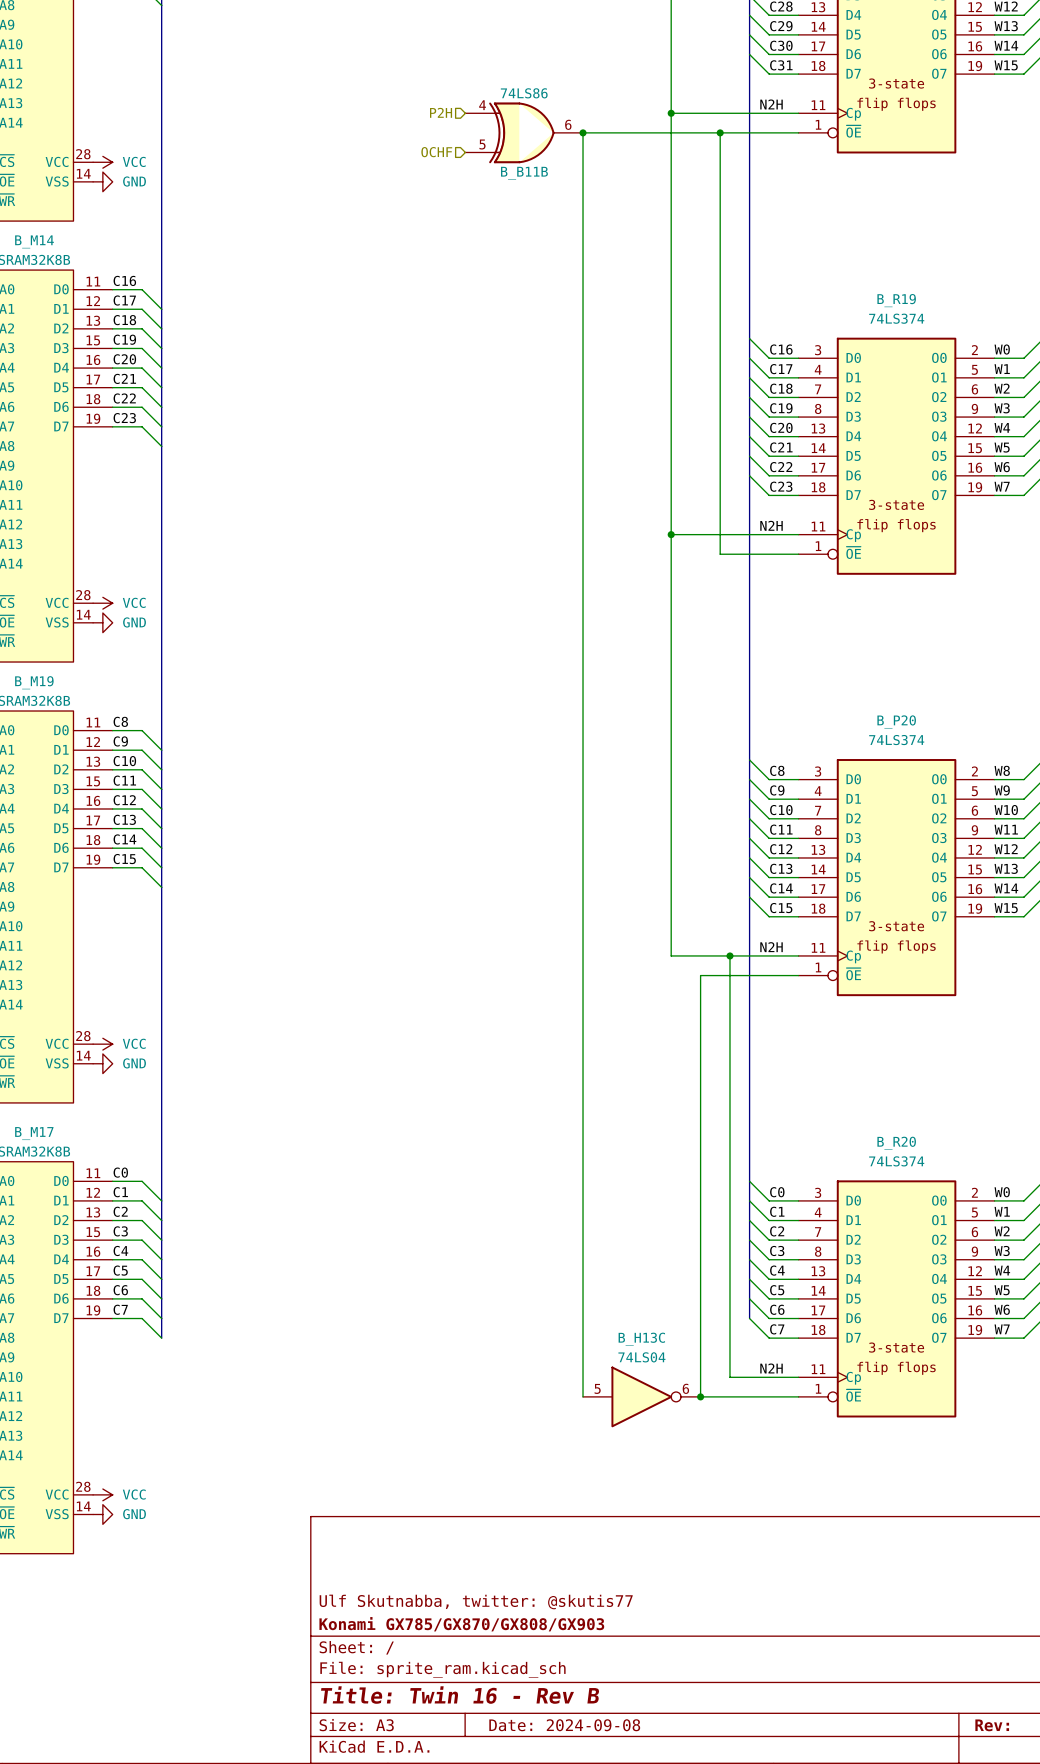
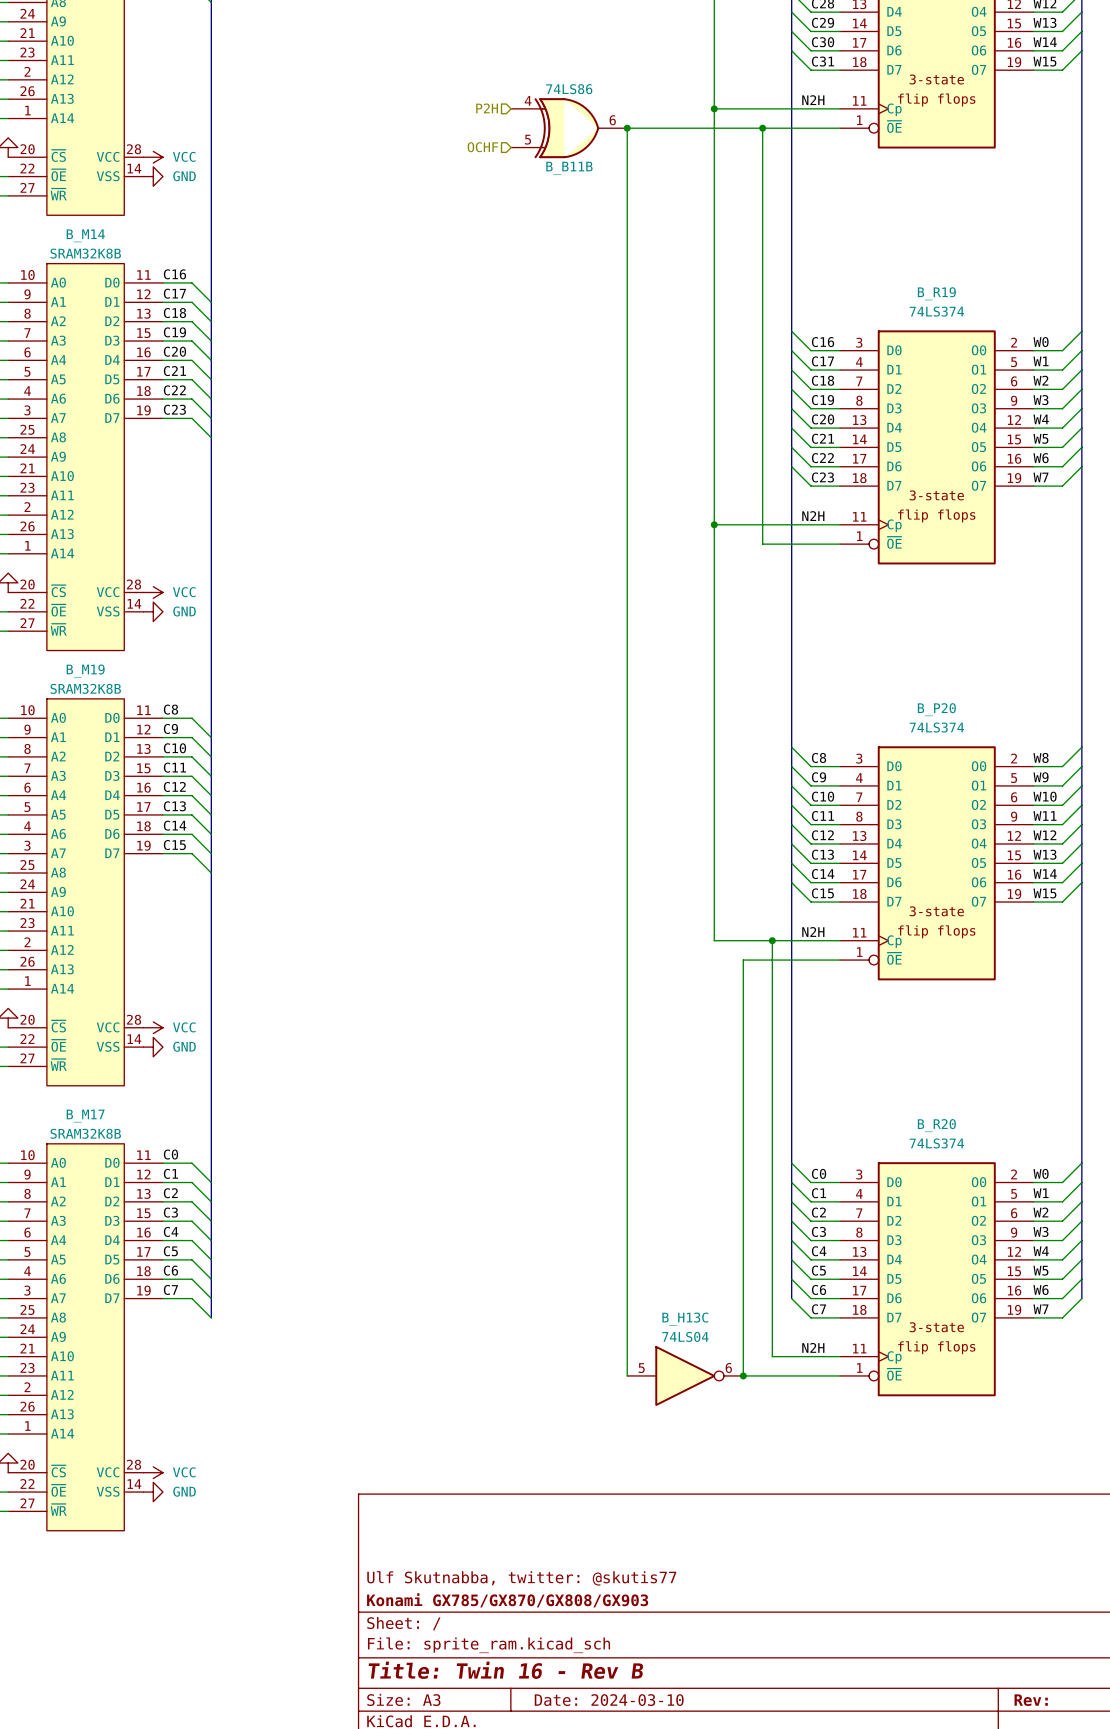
title block: Date: 2024-09-08 (564, 1725) -> Date: 2024-03-10 (609, 1700)

